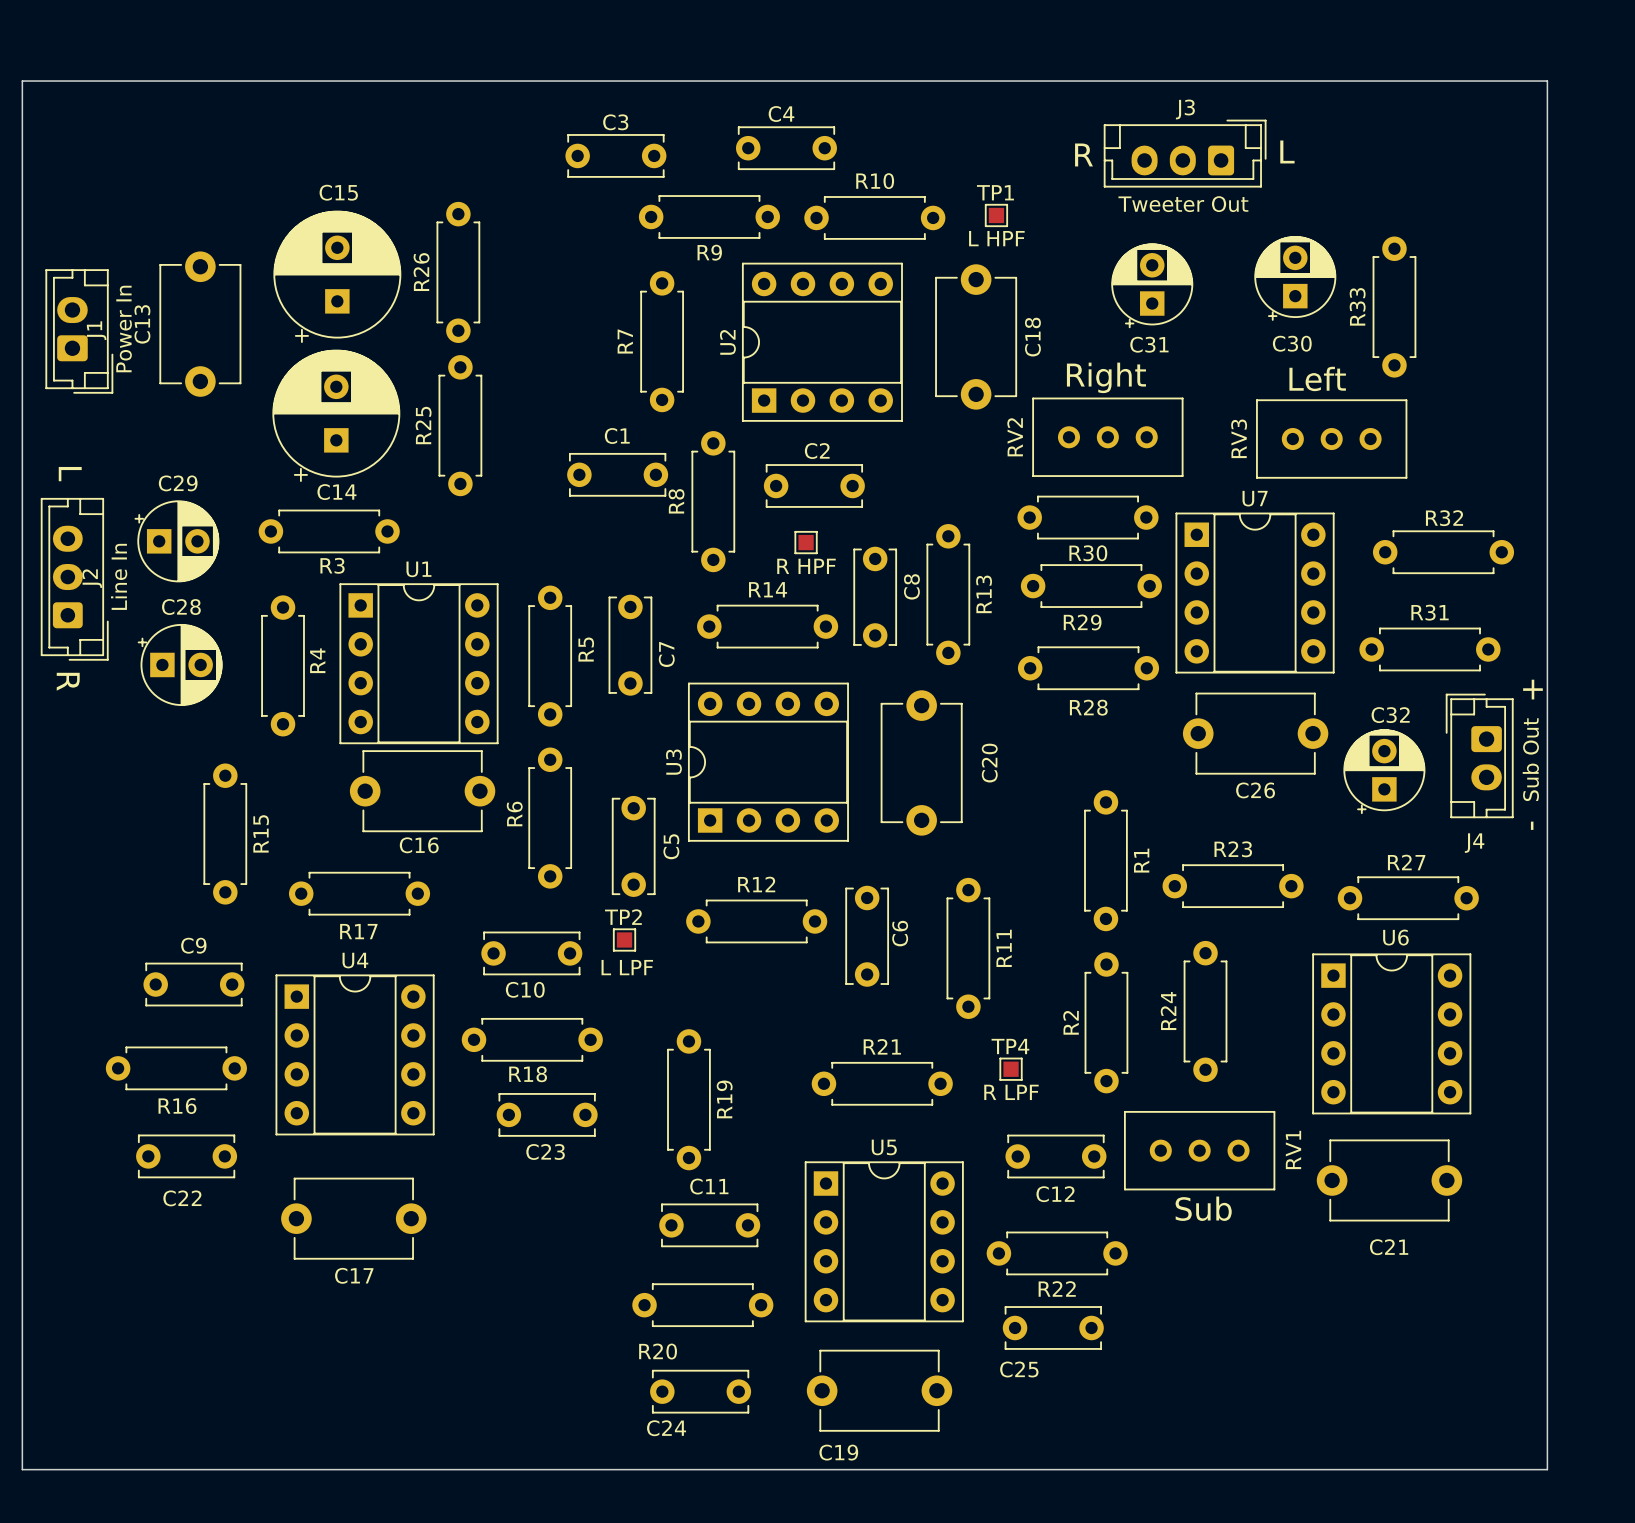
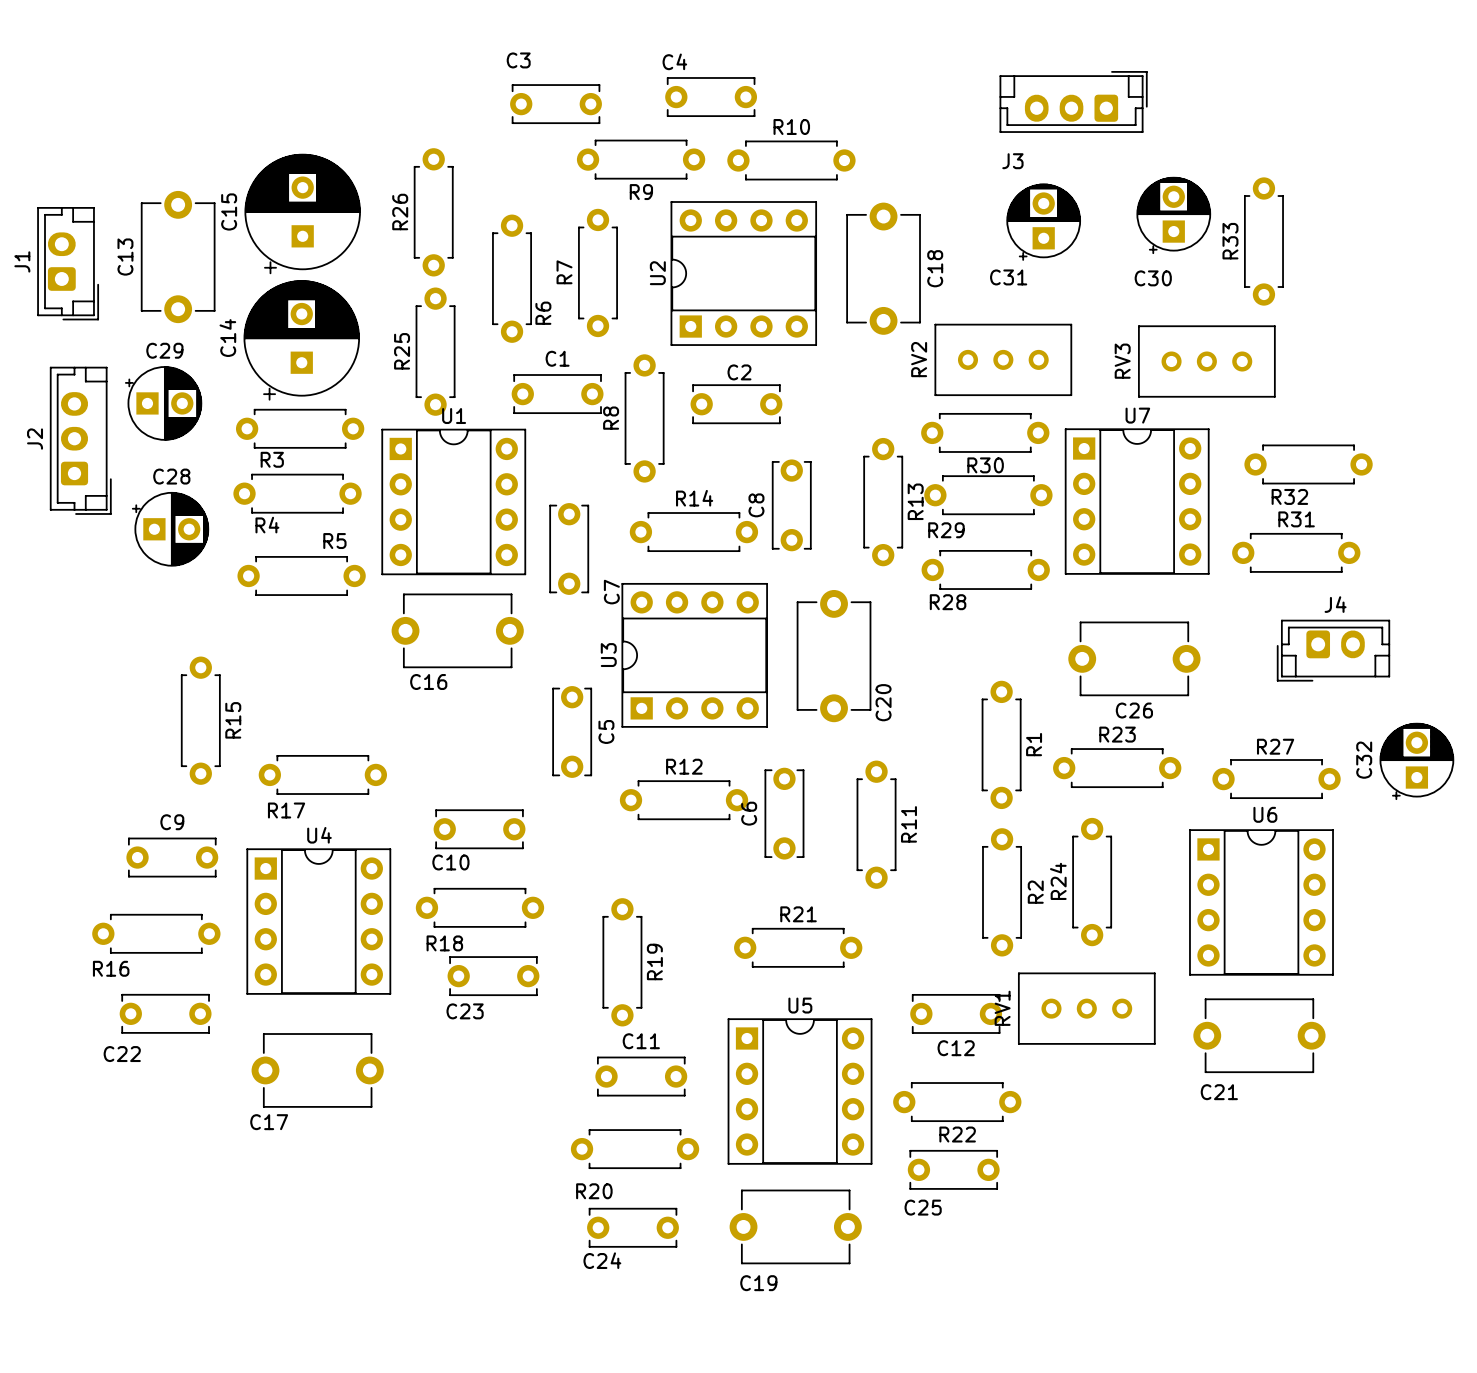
board edge: (22, 81) (1547, 81) (1547, 1469) (22, 1469) (22, 81) -> none
J3 name position: J3 (1185, 109) -> J3 (1012, 161)
C4 name position: C4 (781, 114) -> C4 (674, 61)
C3 name position: C3 (615, 122) -> C3 (518, 60)
text: L (1287, 151) -> none
text: R (1083, 154) -> none
C15 name rotation: 0° (338, 192) -> 90° counterclockwise (229, 211)
C15 name position: C15 (338, 192) -> C15 (229, 211)
J3 value: Tweeter Out (1183, 204) -> none
TP1: L HPF (996, 215) -> none
R26 position: (458, 272) -> (433, 212)
J1 value: Power In (124, 329) -> none
J1 name position: J1 (96, 330) -> J1 (22, 261)
C30 name position: C30 (1292, 343) -> C30 (1153, 278)
C31 name position: C31 (1149, 344) -> C31 (1008, 277)
text: Right (1106, 377) -> none
text: Left (1317, 378) -> none
R25 position: (460, 425) -> (435, 351)
text: L (70, 474) -> none
C14 name rotation: 0° (336, 492) -> 90° counterclockwise (227, 338)
C14 name position: C14 (336, 492) -> C14 (227, 338)
R32 name position: R32 (1444, 518) -> R32 (1289, 496)
R3 position: (329, 531) -> (300, 428)
C29 position: (176, 541) -> (163, 403)
part: R HPF (806, 542) -> none
R3 name position: R3 (332, 565) -> R3 (272, 459)
J2 value: Line In (119, 576) -> none
J2 name position: J2 (92, 578) -> J2 (35, 439)
J2 position: (74, 579) -> (80, 440)
C8 name position: C8 (911, 586) -> C8 (756, 505)
R13 position: (948, 594) -> (883, 502)
R29 name position: R29 (1082, 622) -> R29 (946, 530)
R5 name position: R5 (586, 649) -> R5 (334, 541)
C7 name position: C7 (666, 654) -> C7 (611, 592)
R5 rotation: 0° (550, 656) -> 90° clockwise (301, 575)
R5 position: (550, 656) -> (301, 575)
R4 name position: R4 (317, 660) -> R4 (267, 525)
U1 position: (419, 663) -> (453, 501)
C28 position: (180, 664) -> (170, 529)
R4 rotation: 0° (283, 665) -> 90° clockwise (297, 493)
R4 position: (283, 665) -> (297, 493)
text: R (68, 681) -> none
text: + (1532, 689) -> none
R28 name position: R28 (1088, 707) -> R28 (948, 602)
C32 name rotation: 0° (1390, 715) -> 90° counterclockwise (1364, 760)
C32 name position: C32 (1390, 715) -> C32 (1364, 760)
C26 position: (1255, 733) -> (1134, 658)
J4 rotation: 0° (1479, 755) -> 90° counterclockwise (1333, 650)
J4 value: Sub Out (1530, 759) -> none
C20 name position: C20 (989, 763) -> C20 (883, 702)
C32 position: (1384, 771) -> (1416, 761)
C16 position: (422, 791) -> (457, 630)
R6 name position: R6 (514, 814) -> R6 (543, 313)
R6 position: (550, 818) -> (512, 278)
text: - (1532, 825) -> none
J4 name position: J4 (1474, 843) -> J4 (1335, 604)
C16 name position: C16 (419, 845) -> C16 (428, 682)
R17 name position: R17 (358, 931) -> R17 (286, 810)
C6 name position: C6 (900, 933) -> C6 (749, 813)
TP2: L LPF (624, 939) -> none
C10 name position: C10 (525, 989) -> C10 (450, 862)
R2 name position: R2 (1071, 1022) -> R2 (1035, 892)
TP4: R LPF (1011, 1069) -> none
R18 name position: R18 (528, 1074) -> R18 (444, 943)
R16 name position: R16 (177, 1106) -> R16 (111, 968)
RV1 name position: RV1 (1293, 1149) -> RV1 (1002, 1008)
C23 name position: C23 (545, 1151) -> C23 (465, 1011)
C22 name position: C22 (182, 1198) -> C22 (122, 1054)
text: Sub (1203, 1208) -> none
C21 name position: C21 (1389, 1247) -> C21 (1219, 1092)
C17 name position: C17 (354, 1275) -> C17 (269, 1122)

